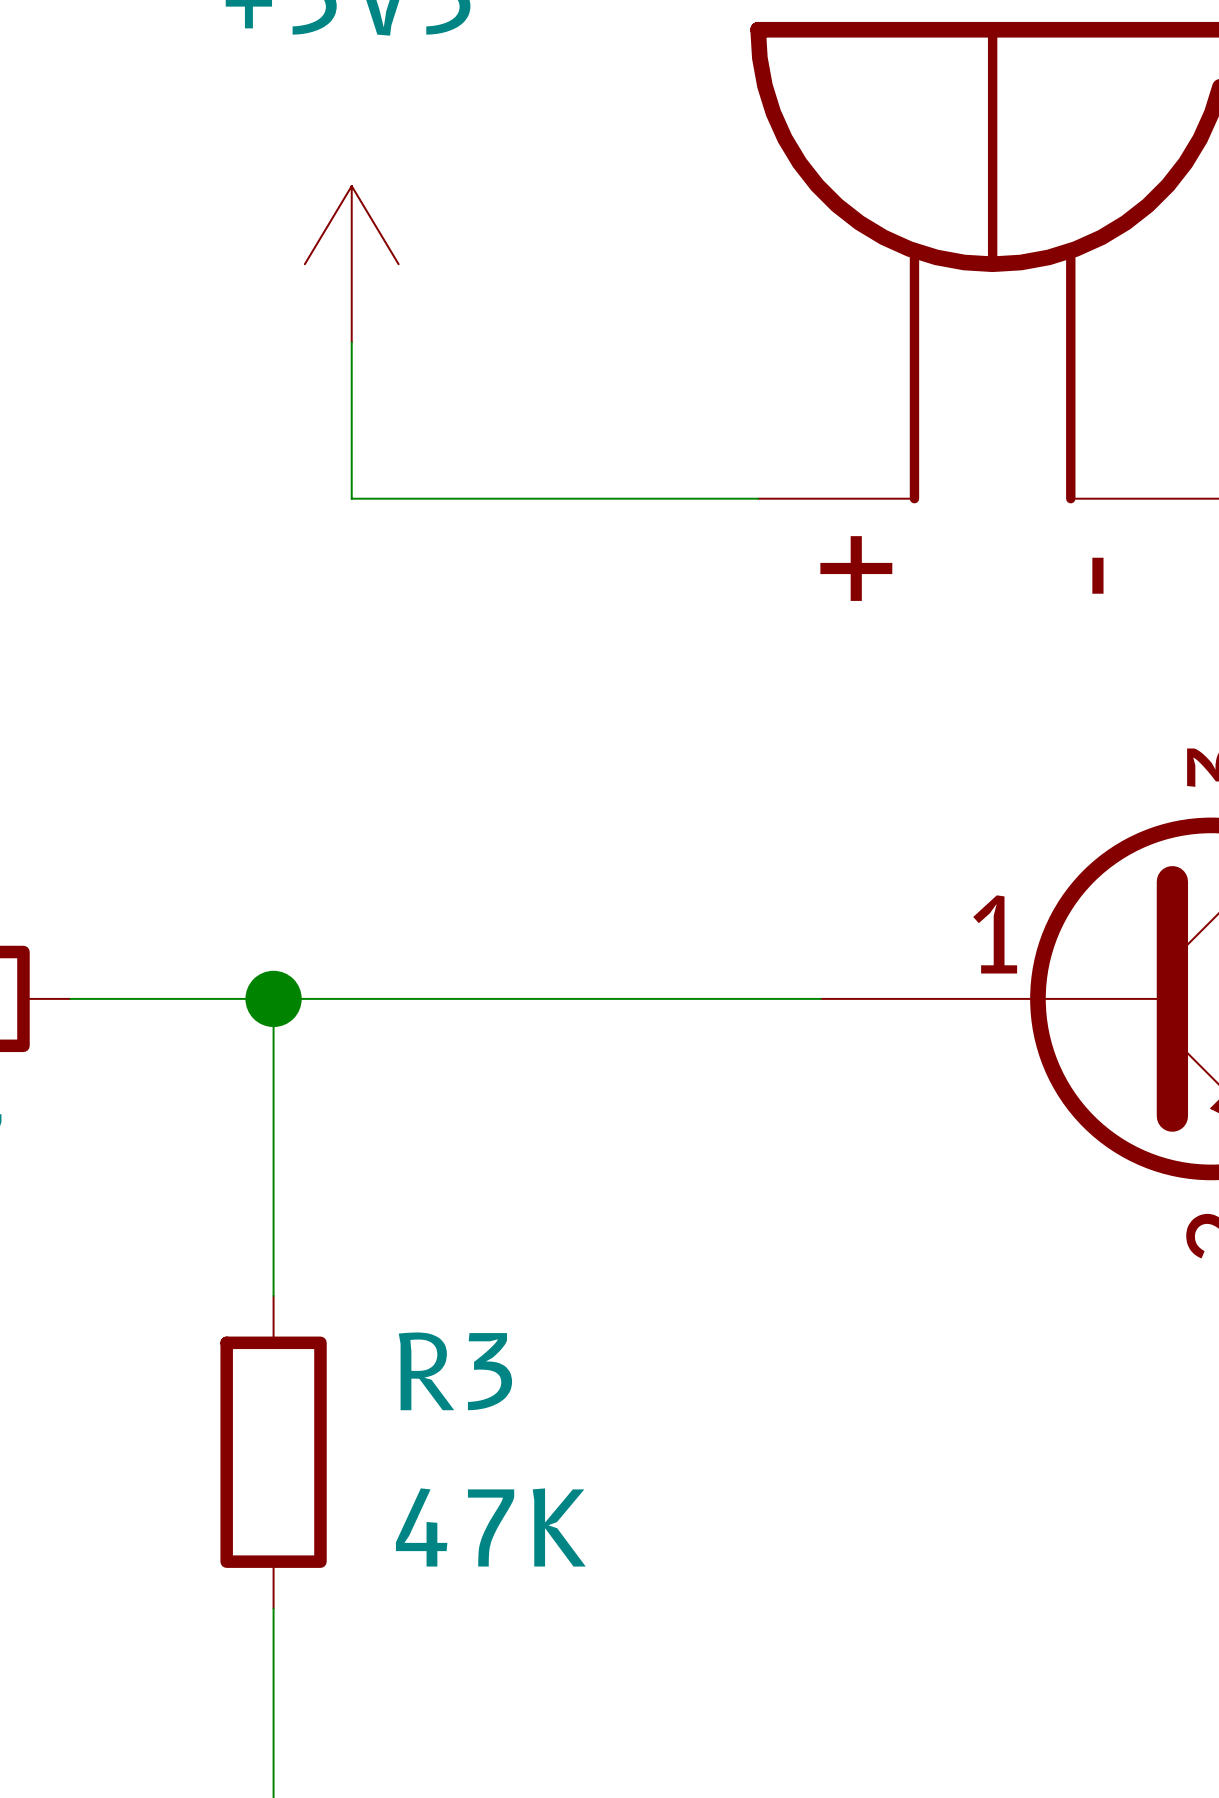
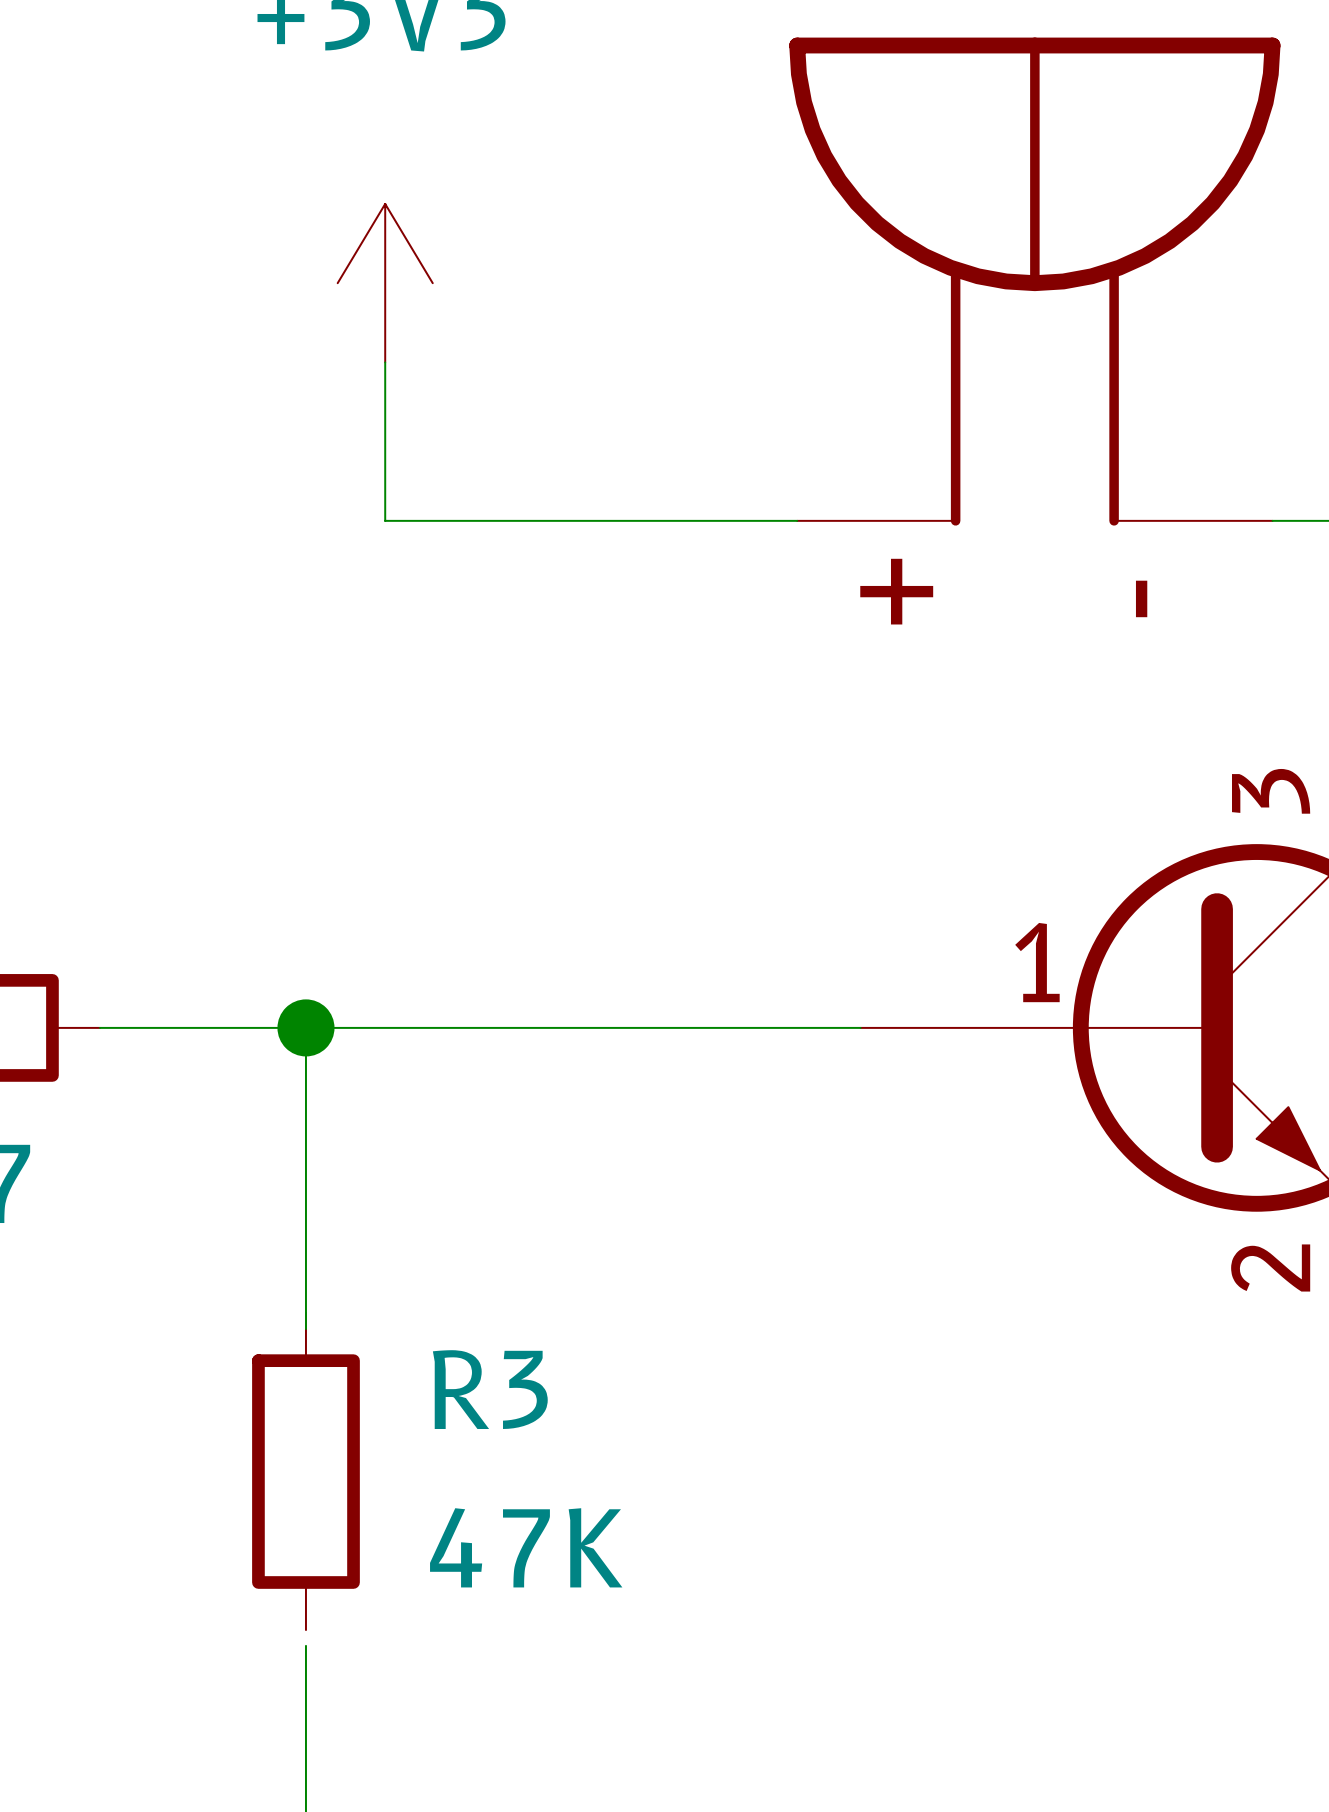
R3 position: (273, 1452) -> (305, 1471)

